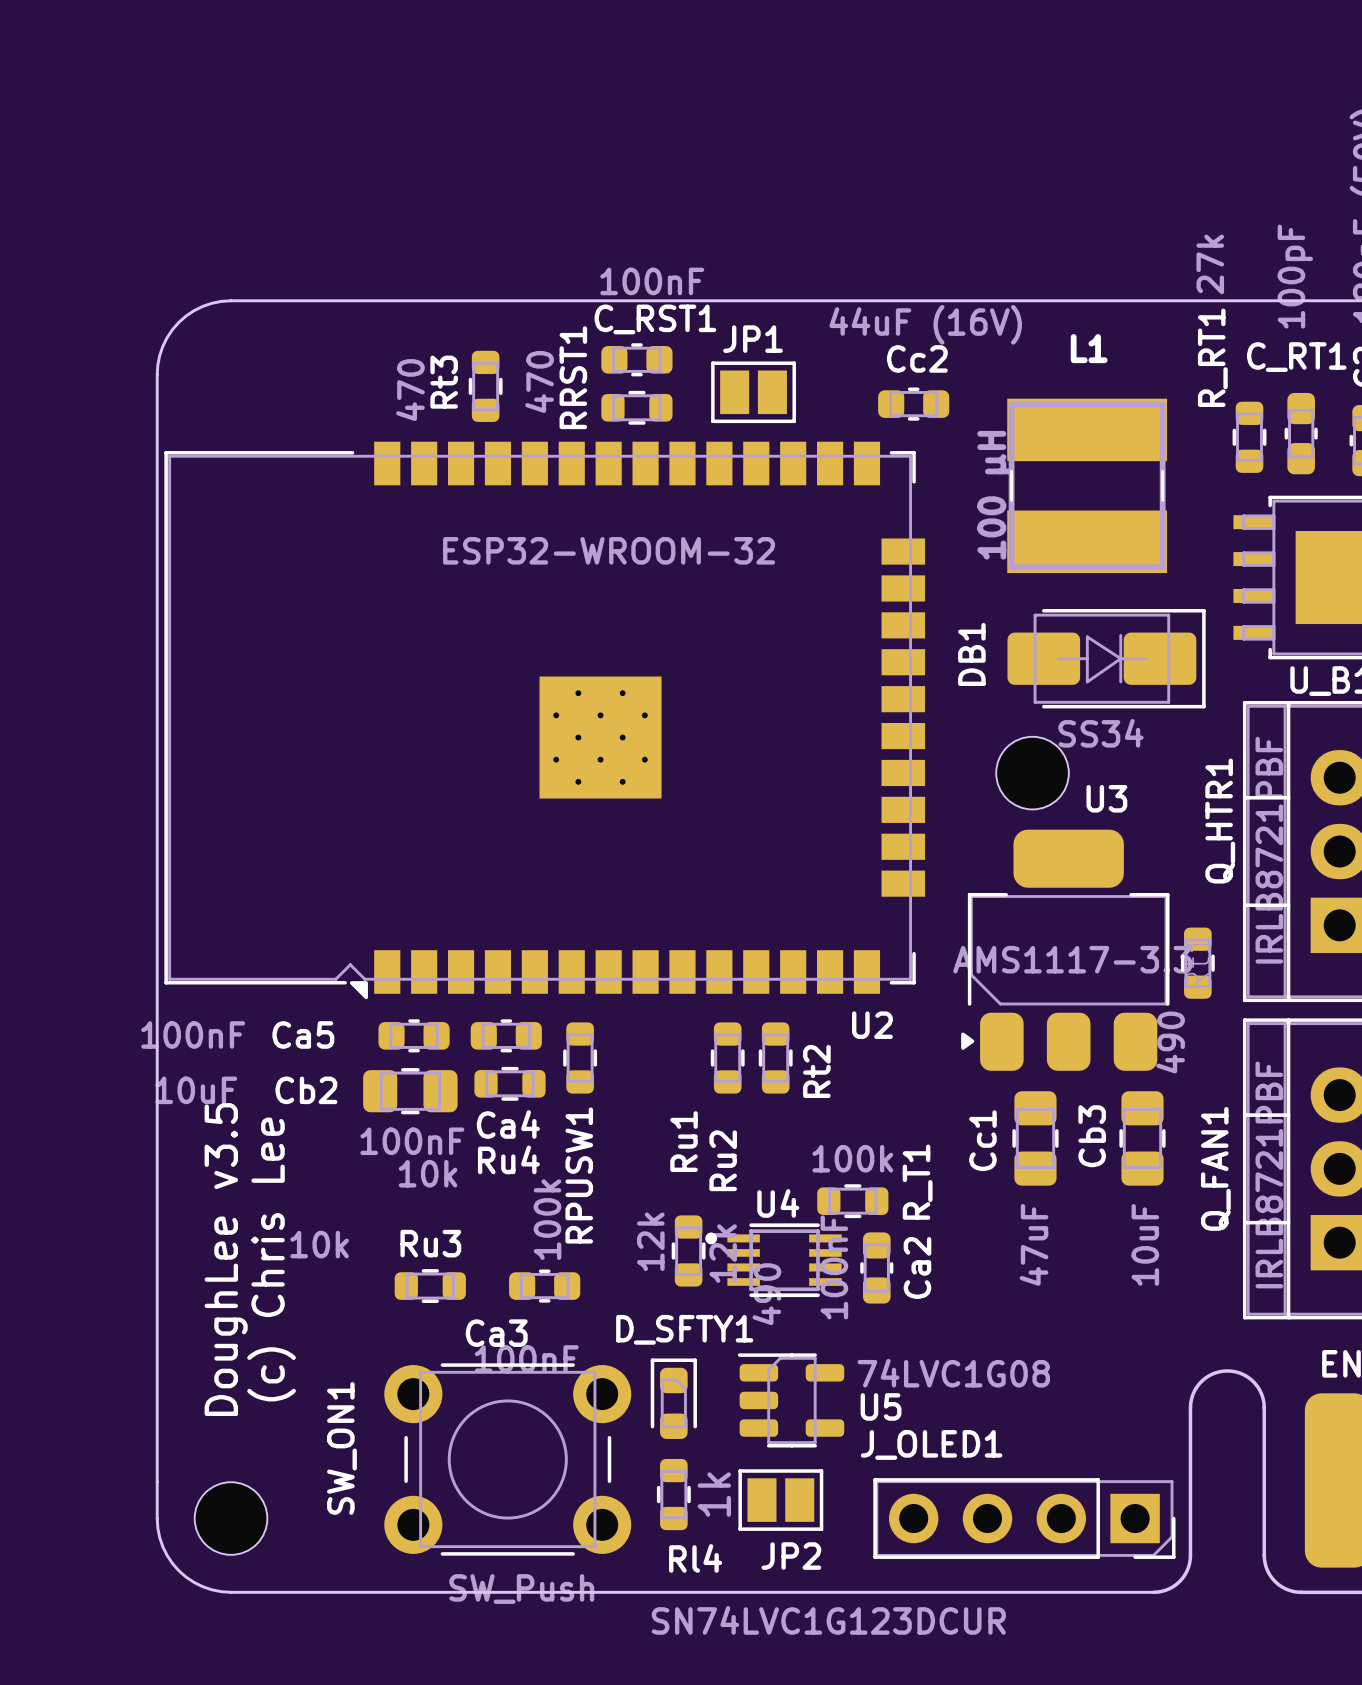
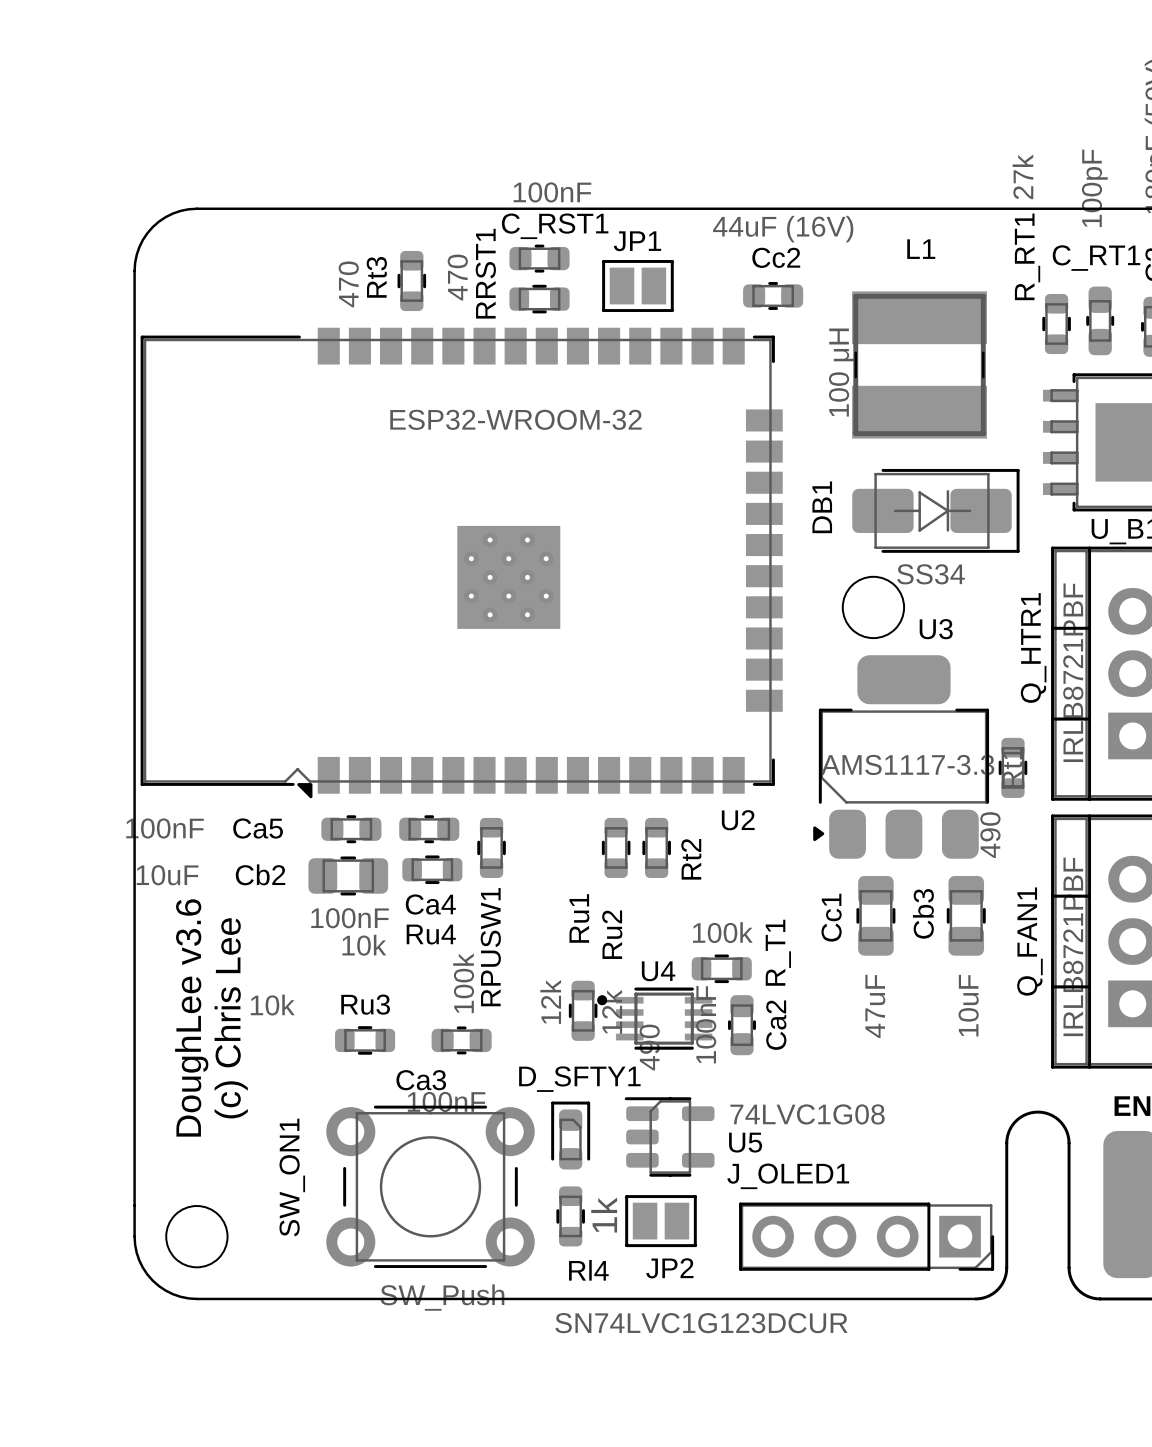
text: DoughLee v3.5 (226, 1259) -> DoughLee v3.6 (191, 1017)

